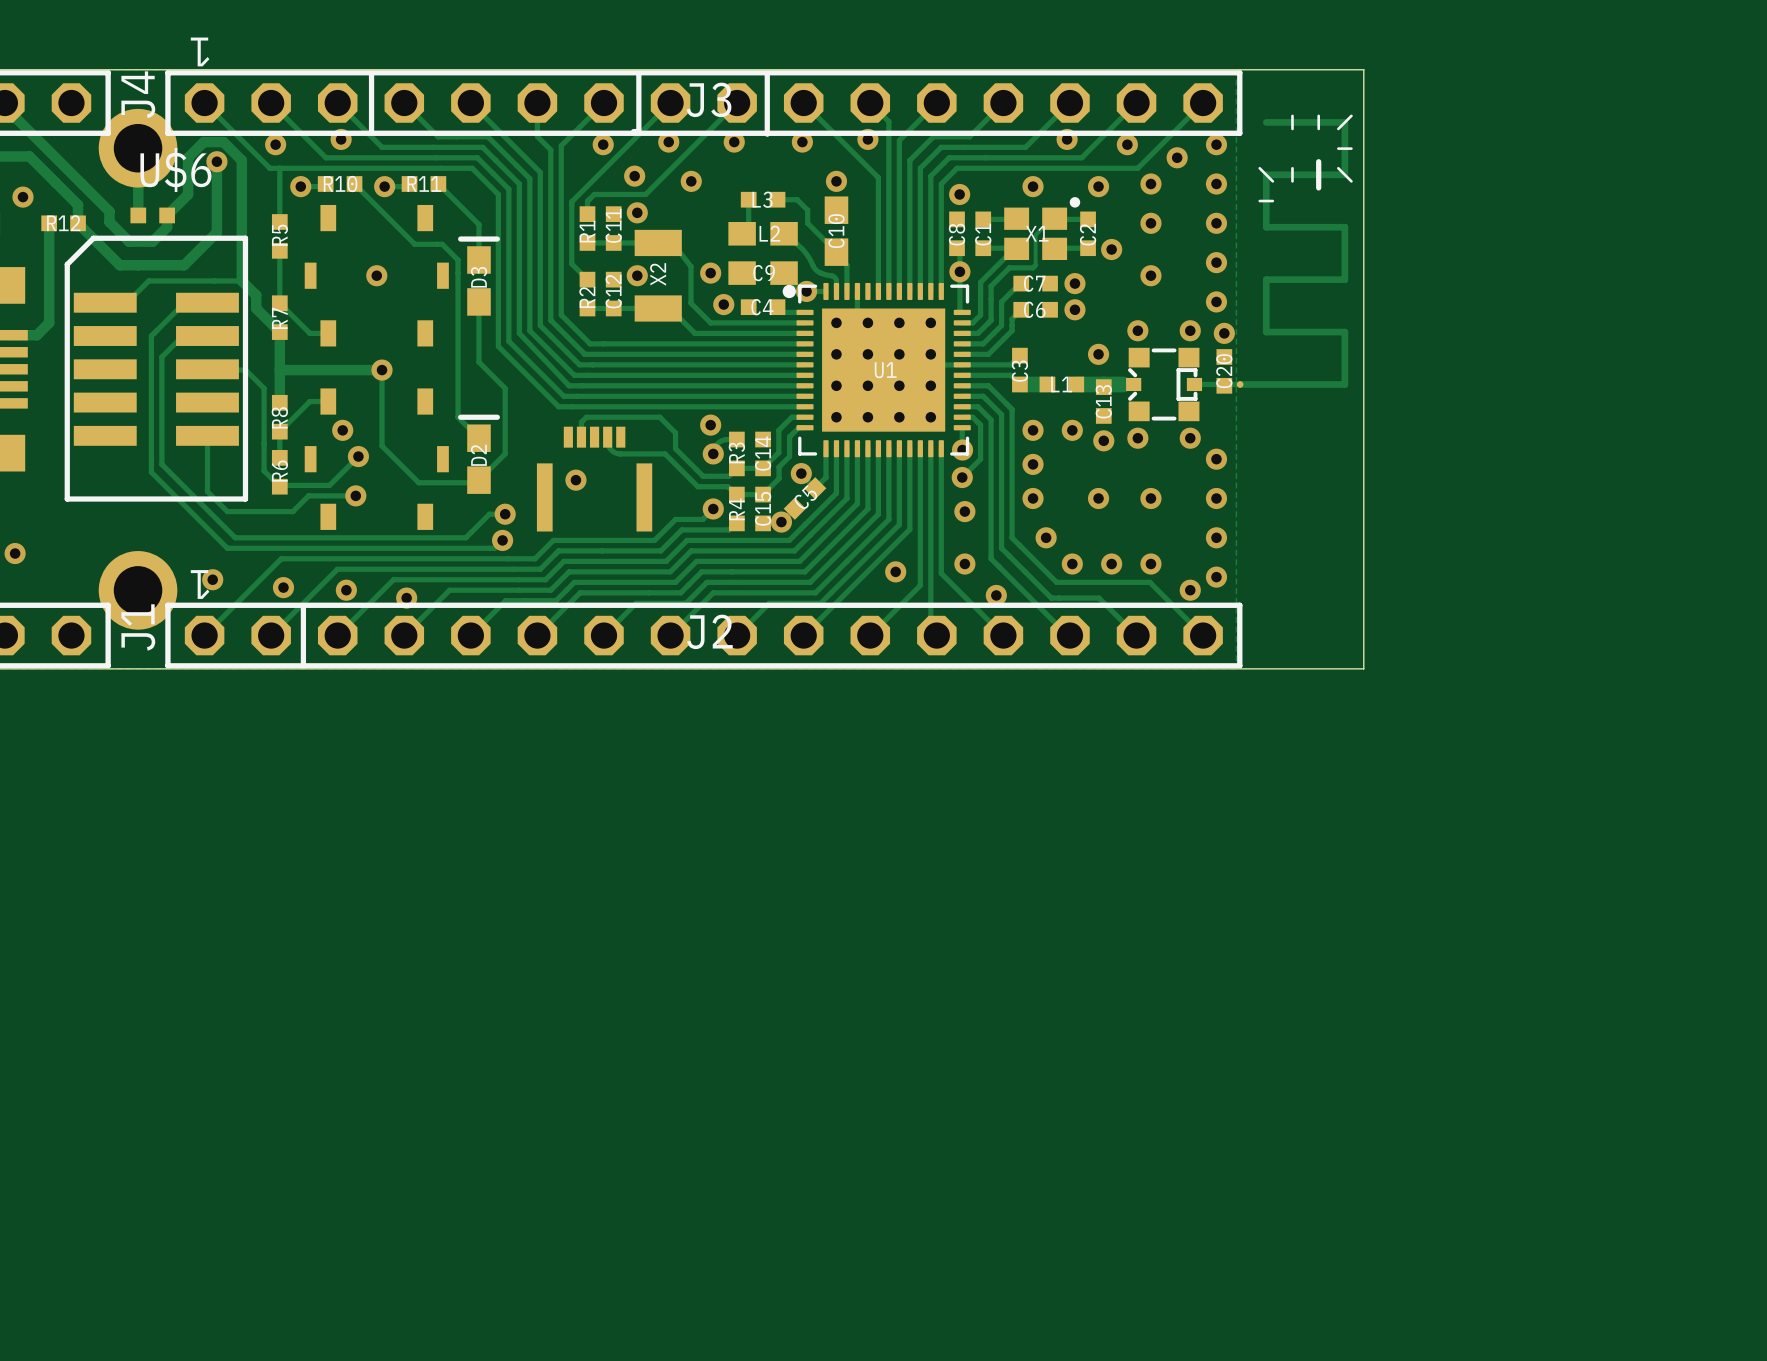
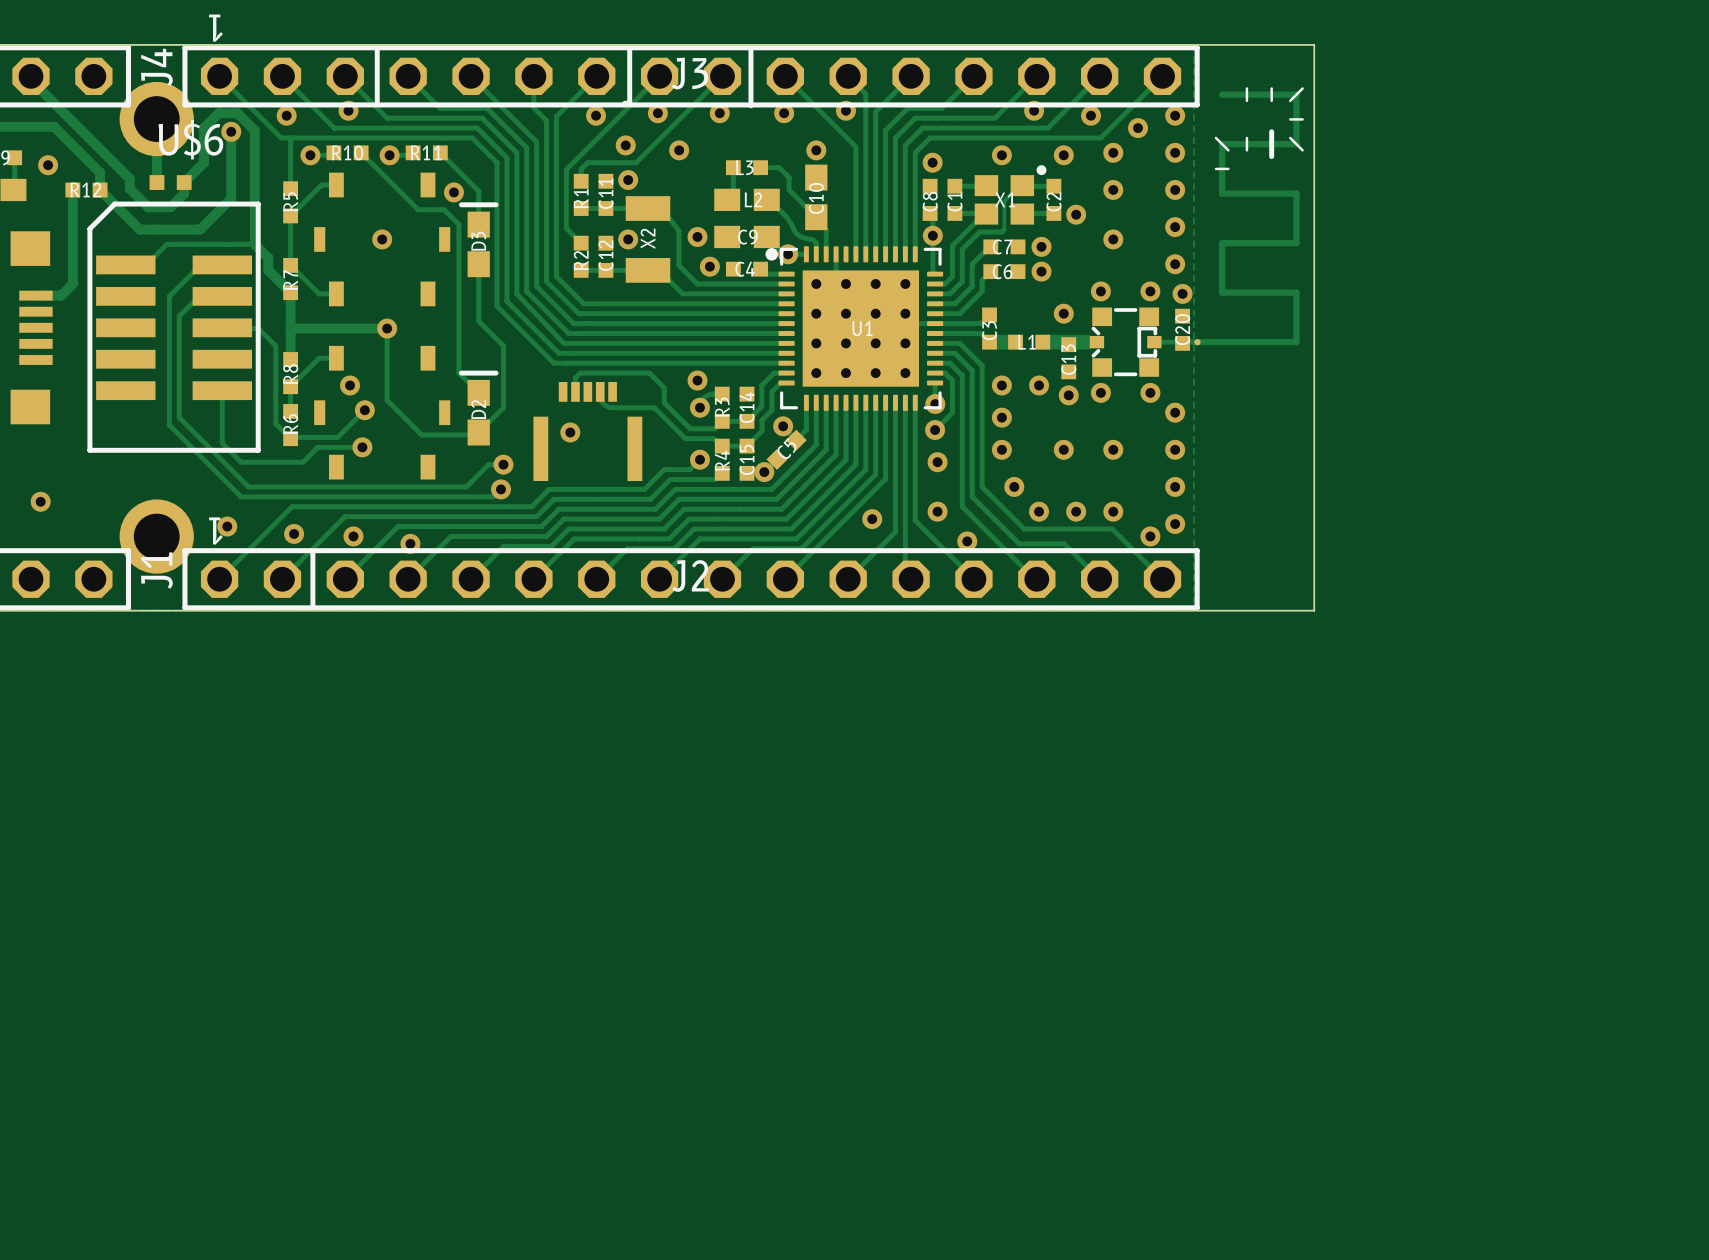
track: none -> (336, 185) (321, 185) (290, 215)
via: none -> (453, 192)

